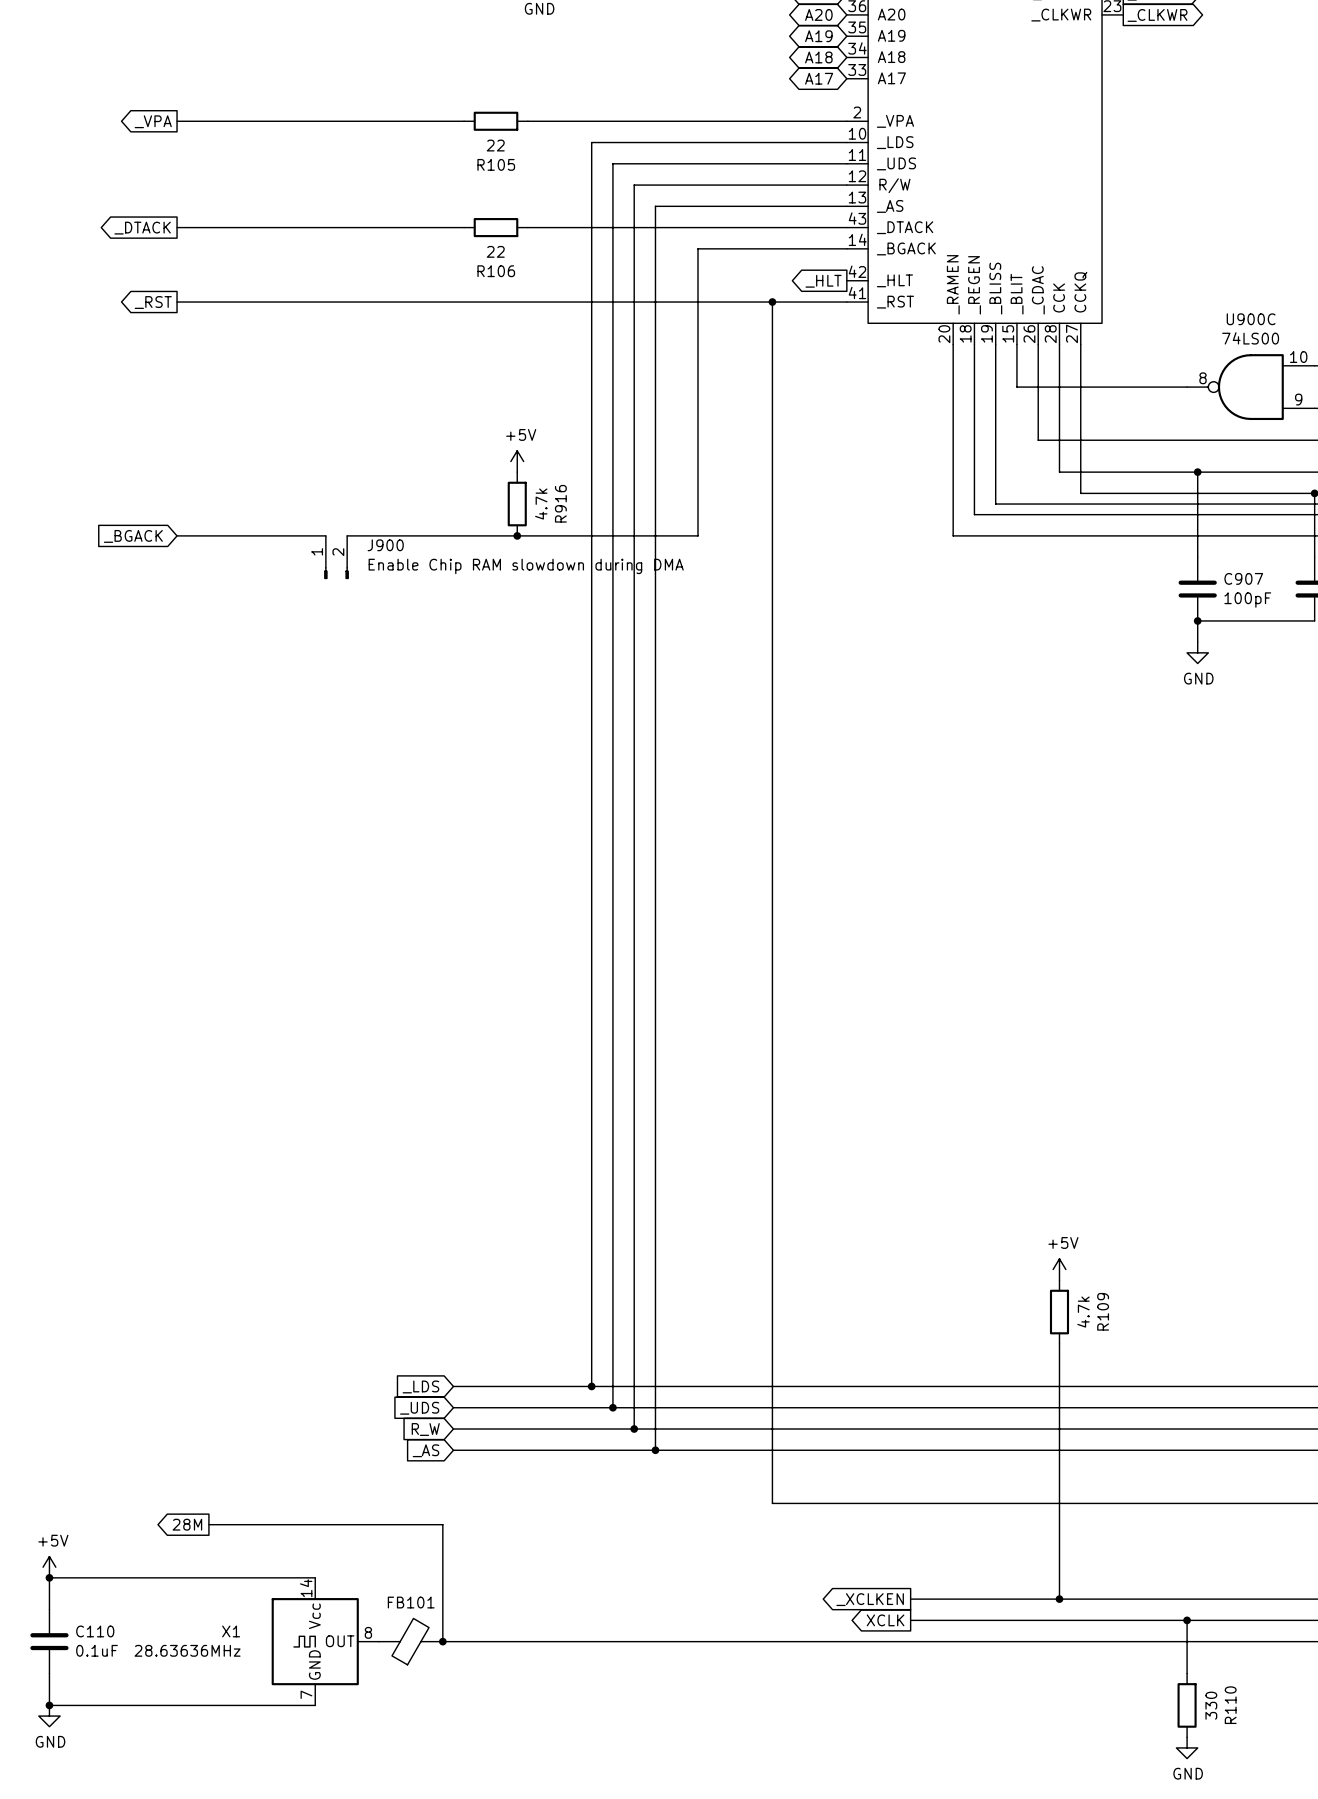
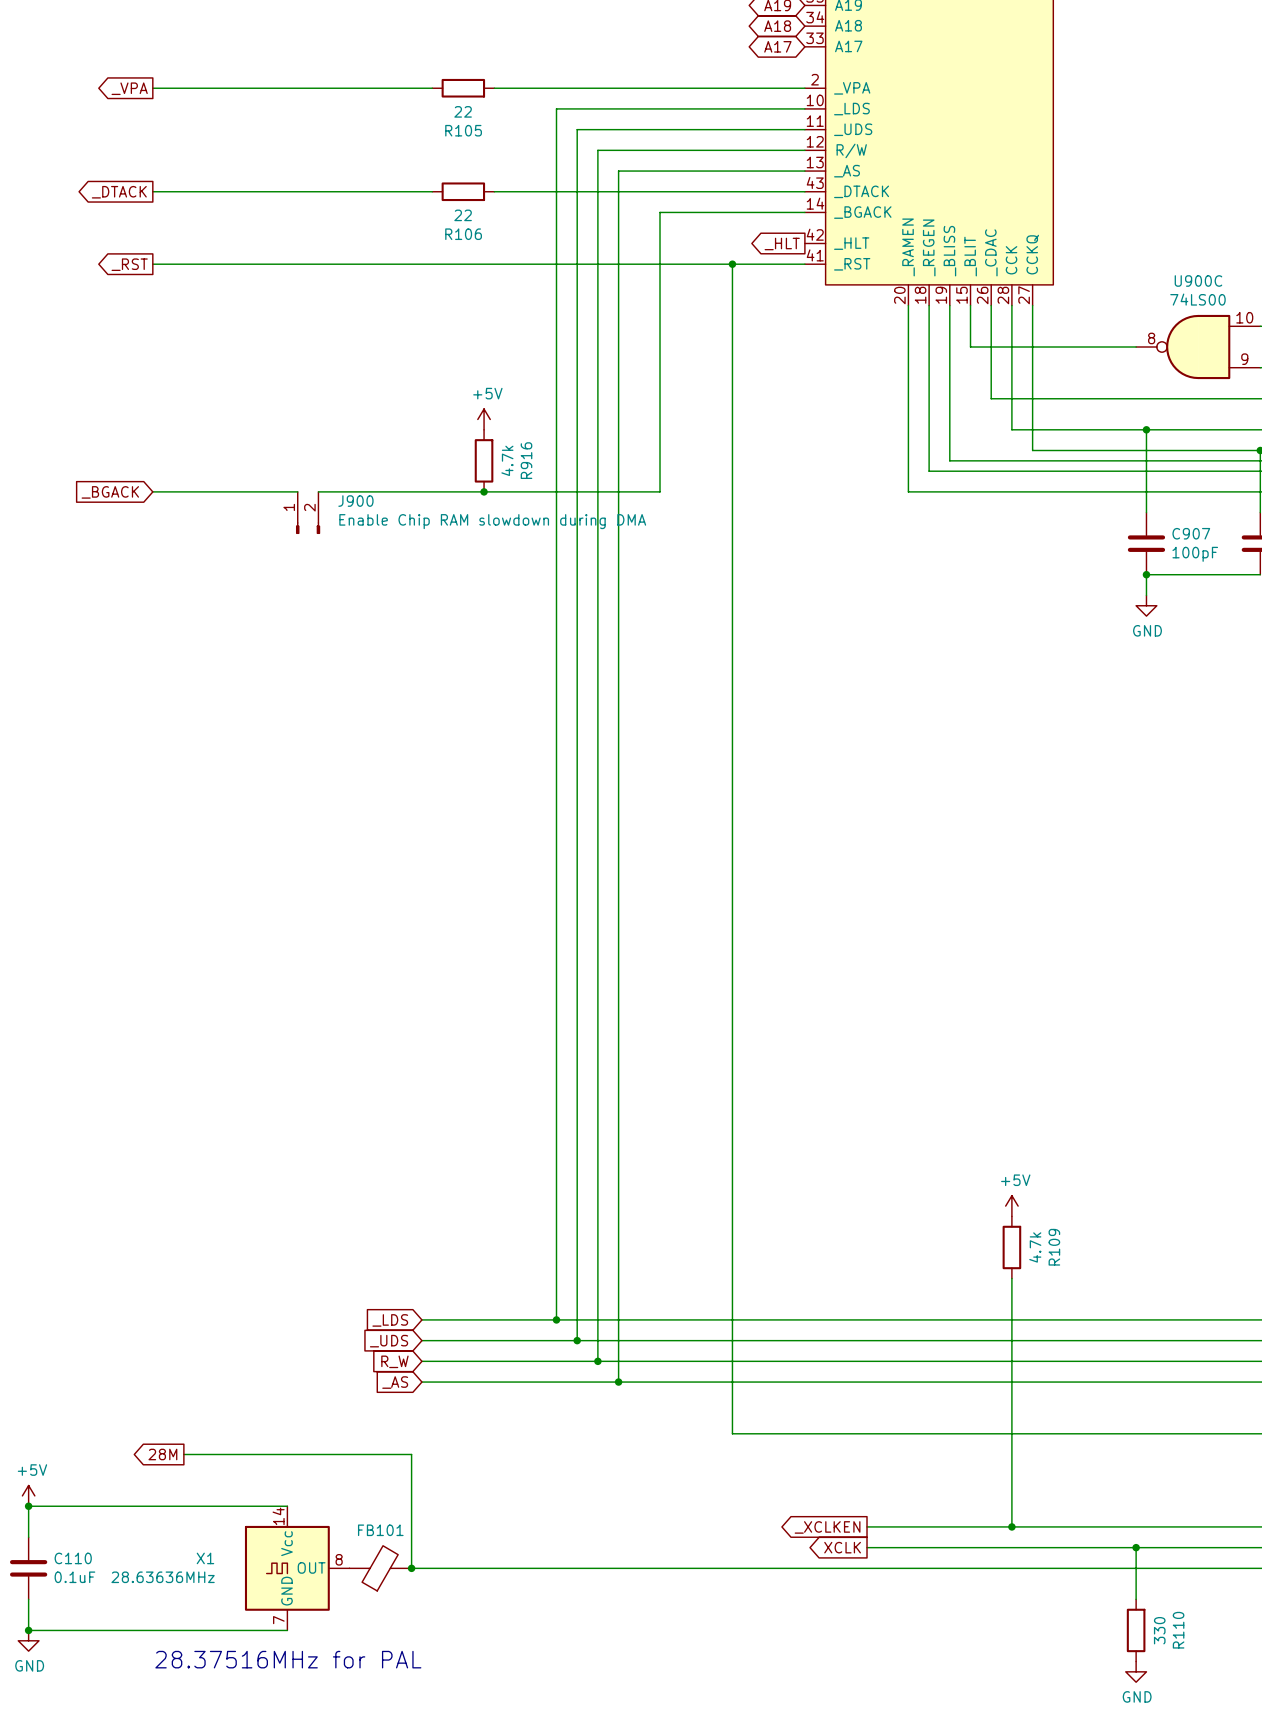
text: none -> 28.37516MHz for PAL (288, 1659)

